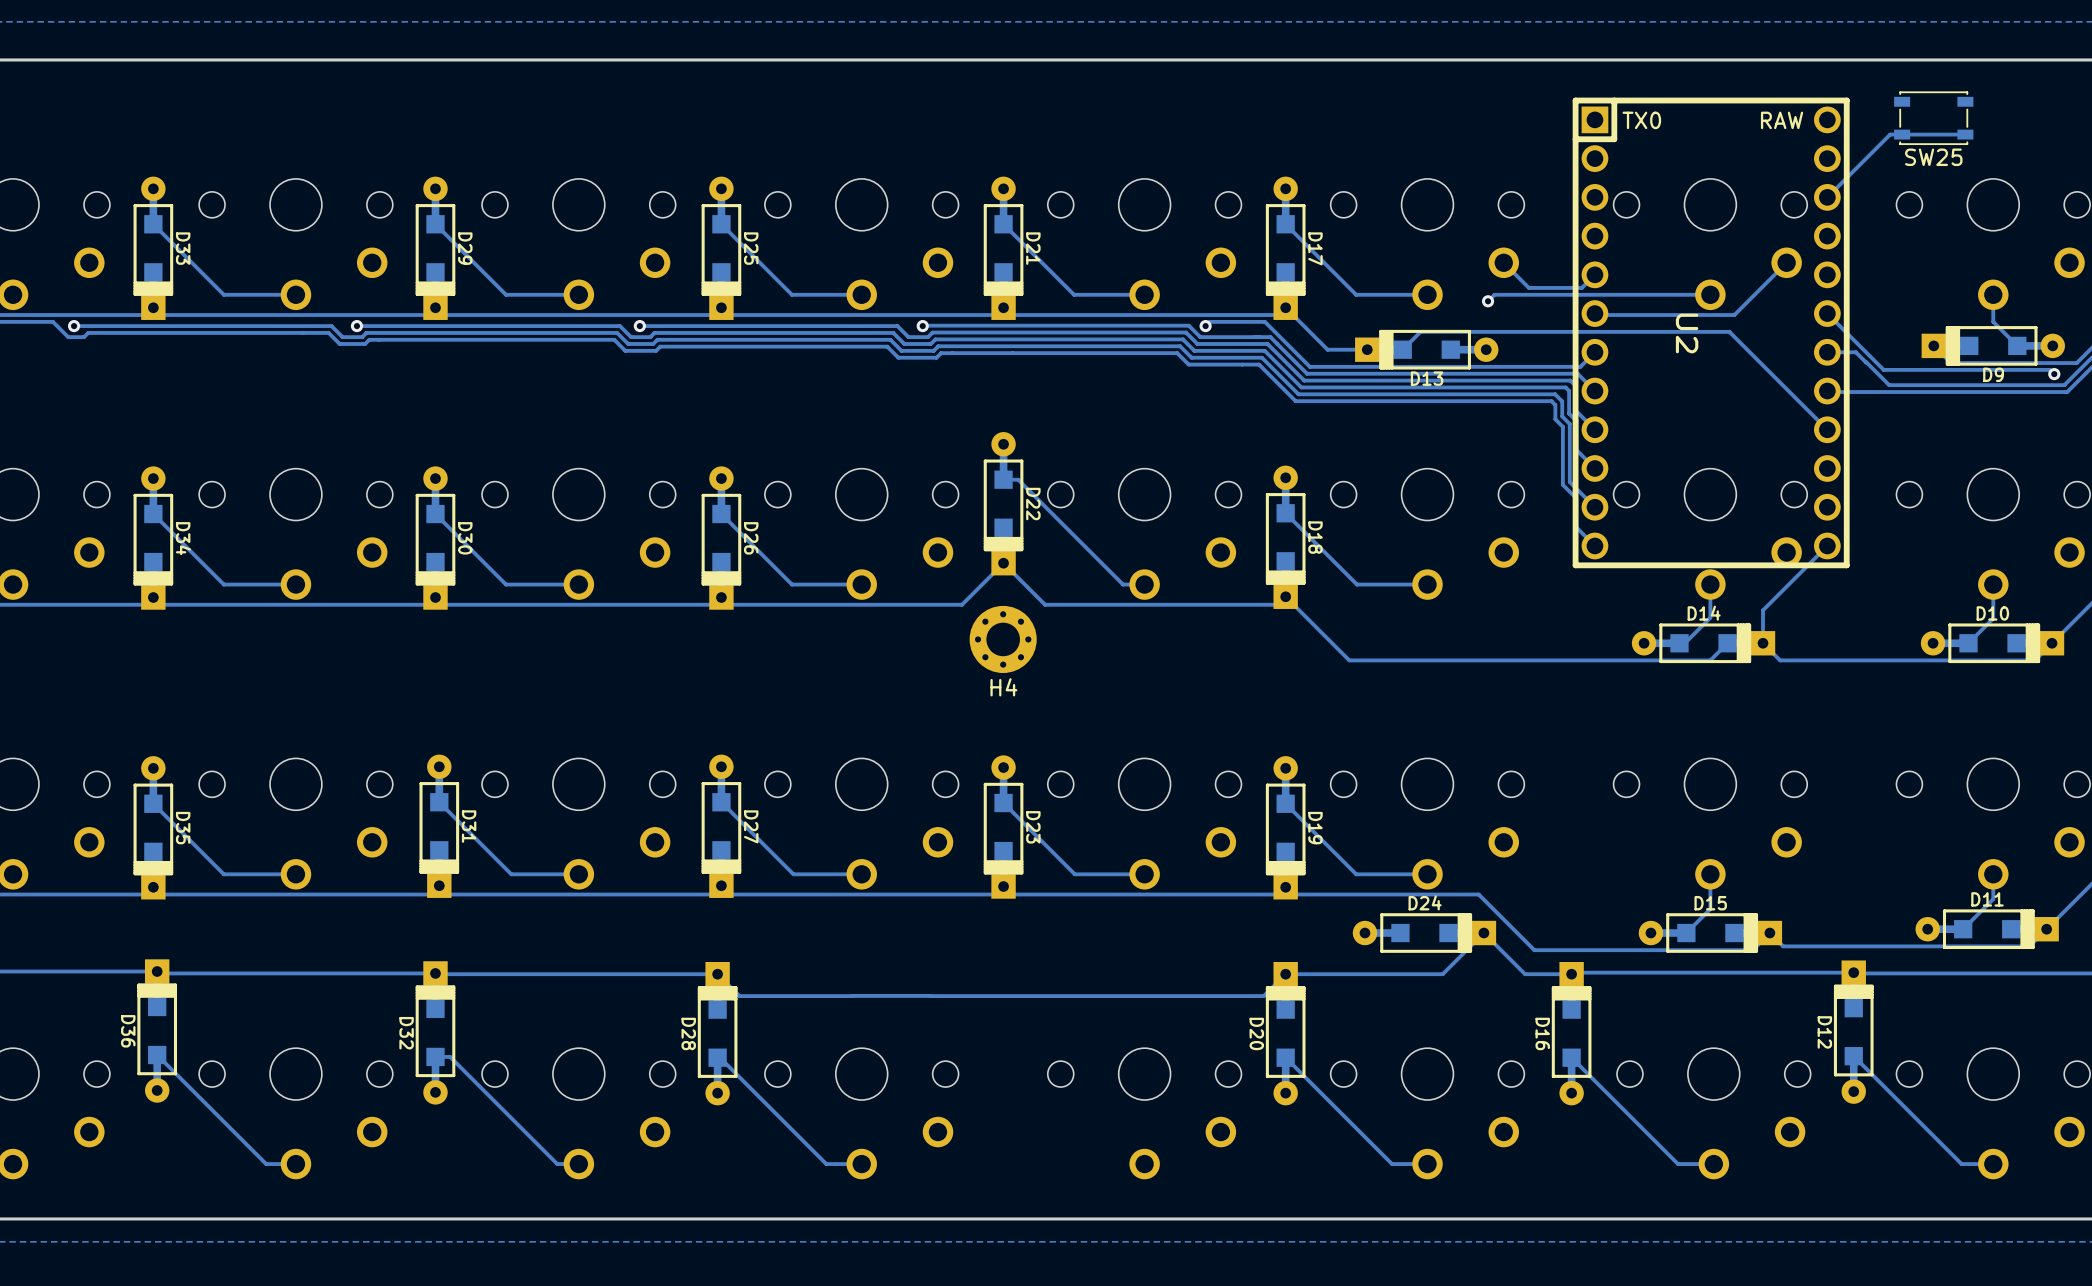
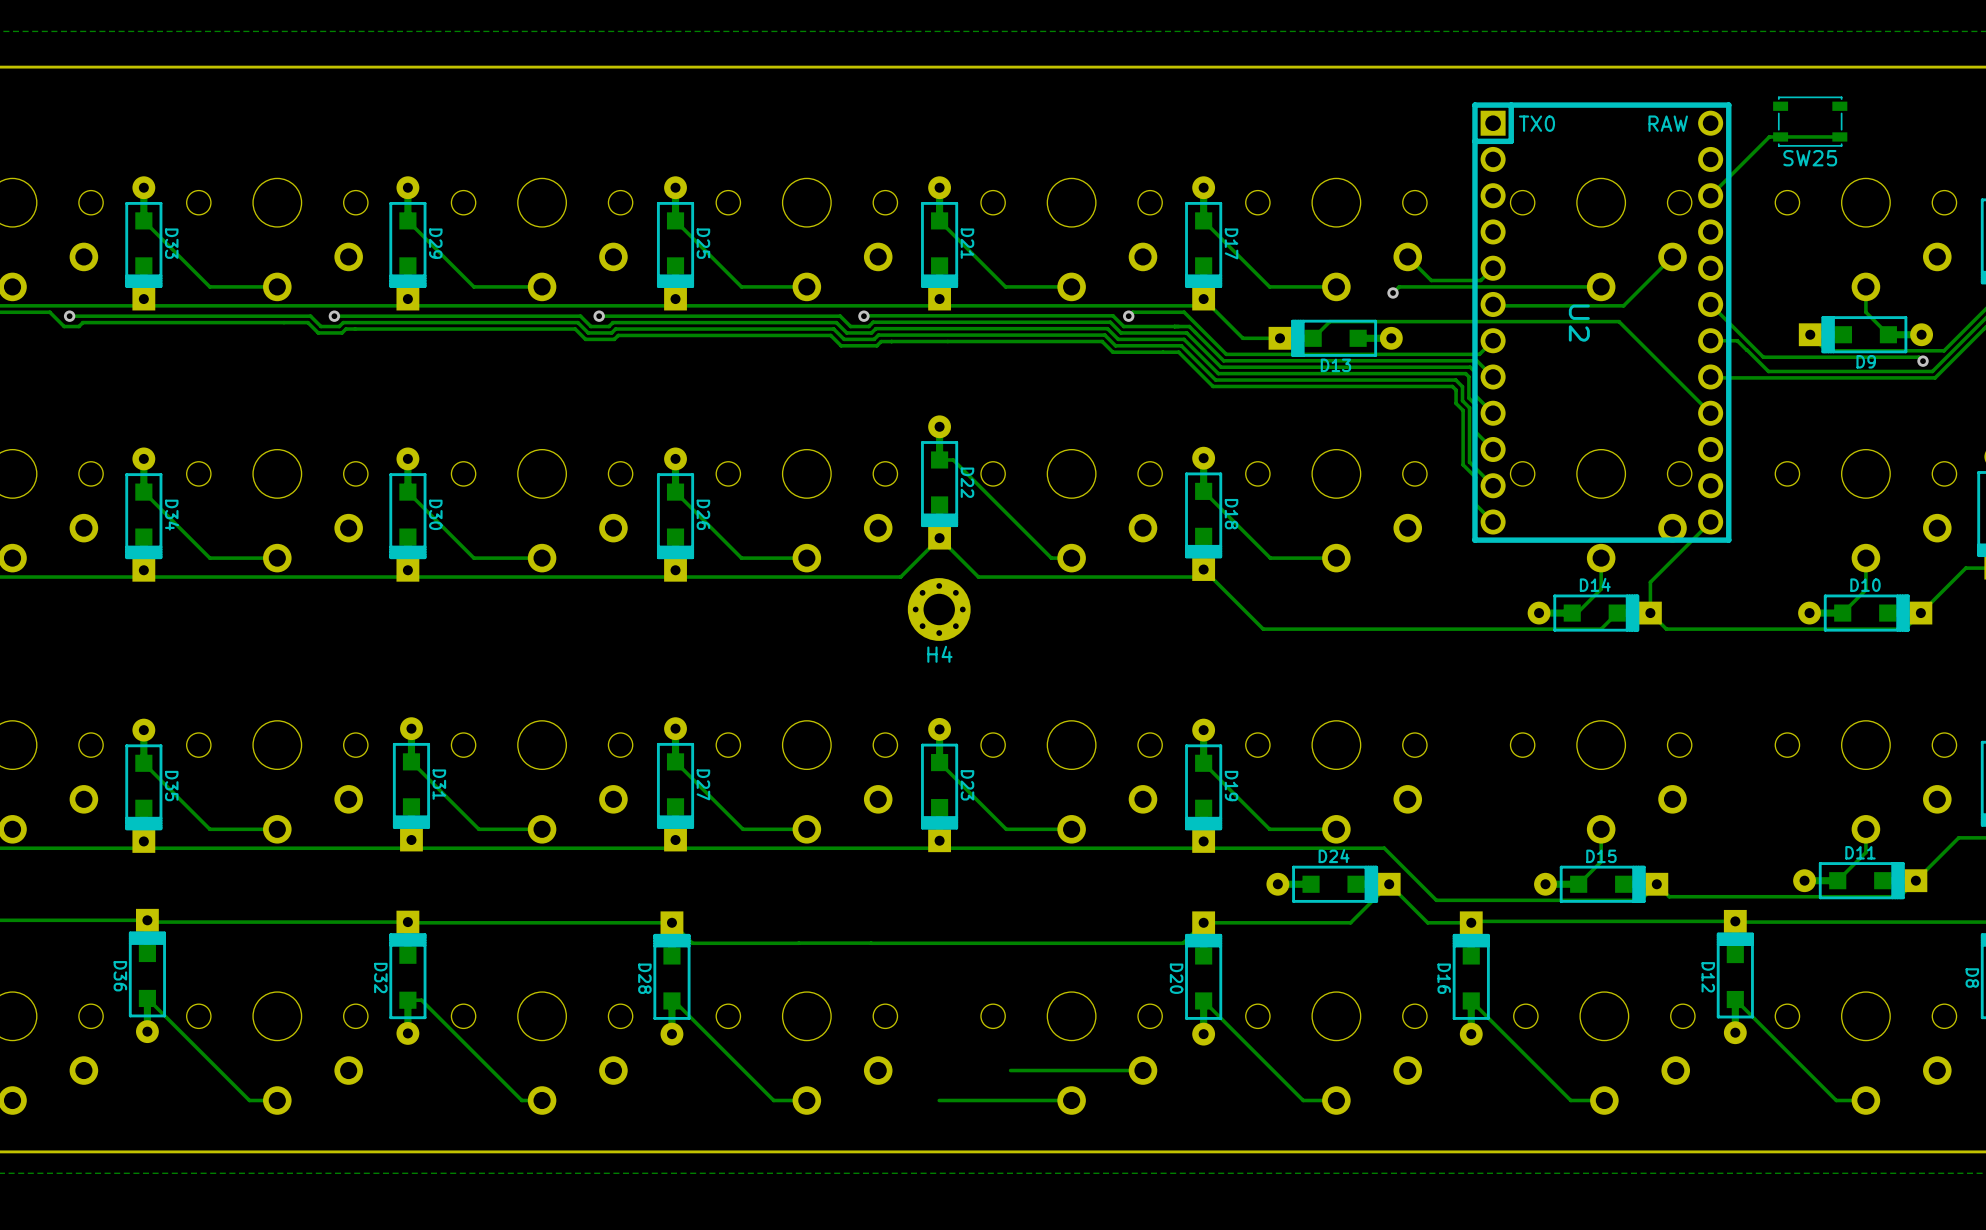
track: none -> (1142, 1070) (1010, 1070)
track: none -> (1071, 1100) (939, 1100)

